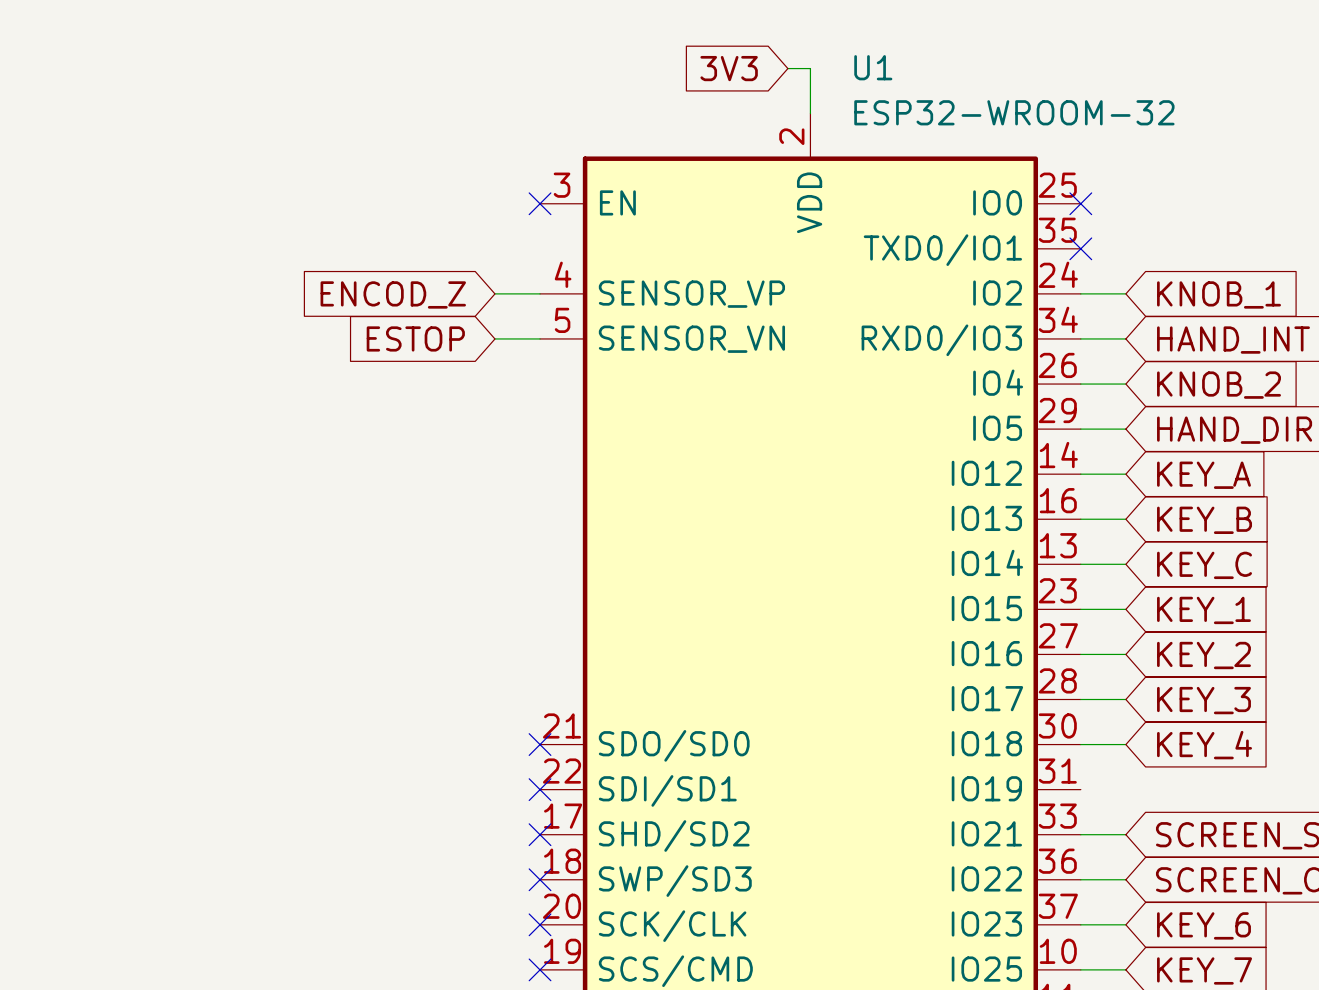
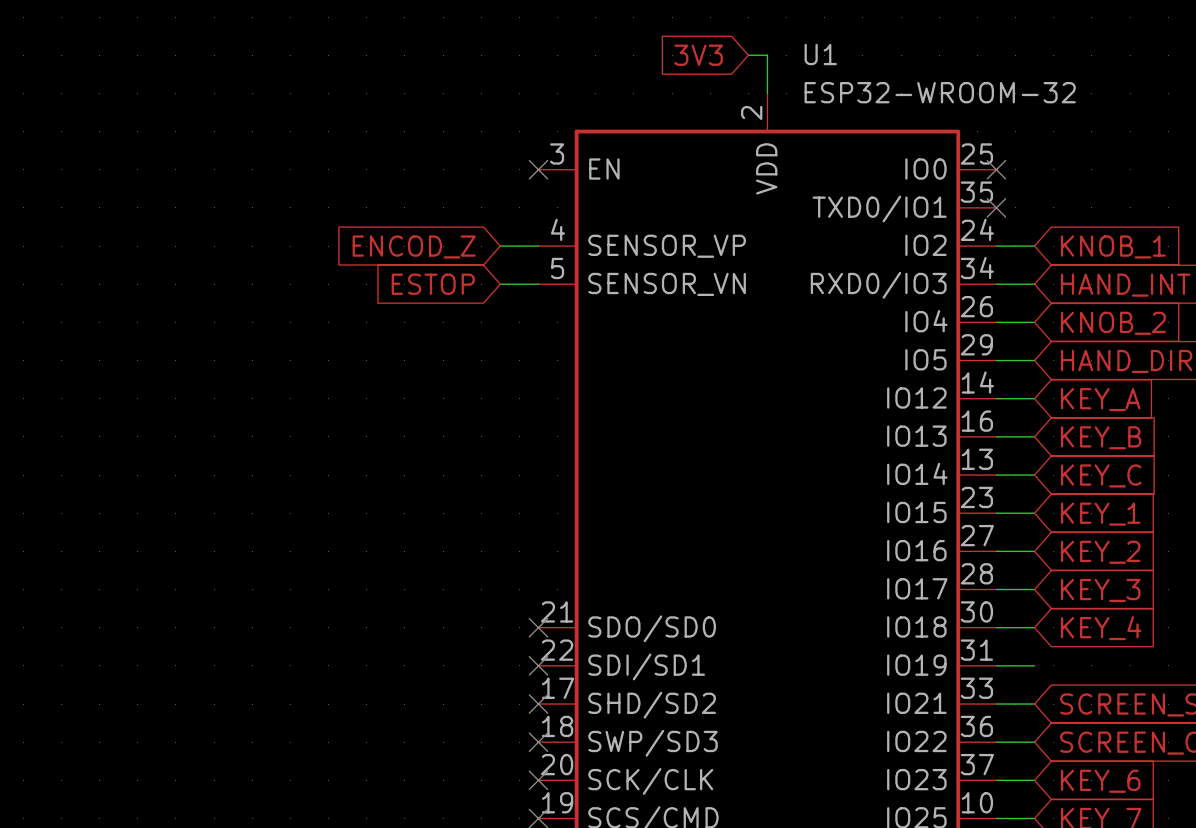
wire: none -> (996, 665) (1034, 665)

